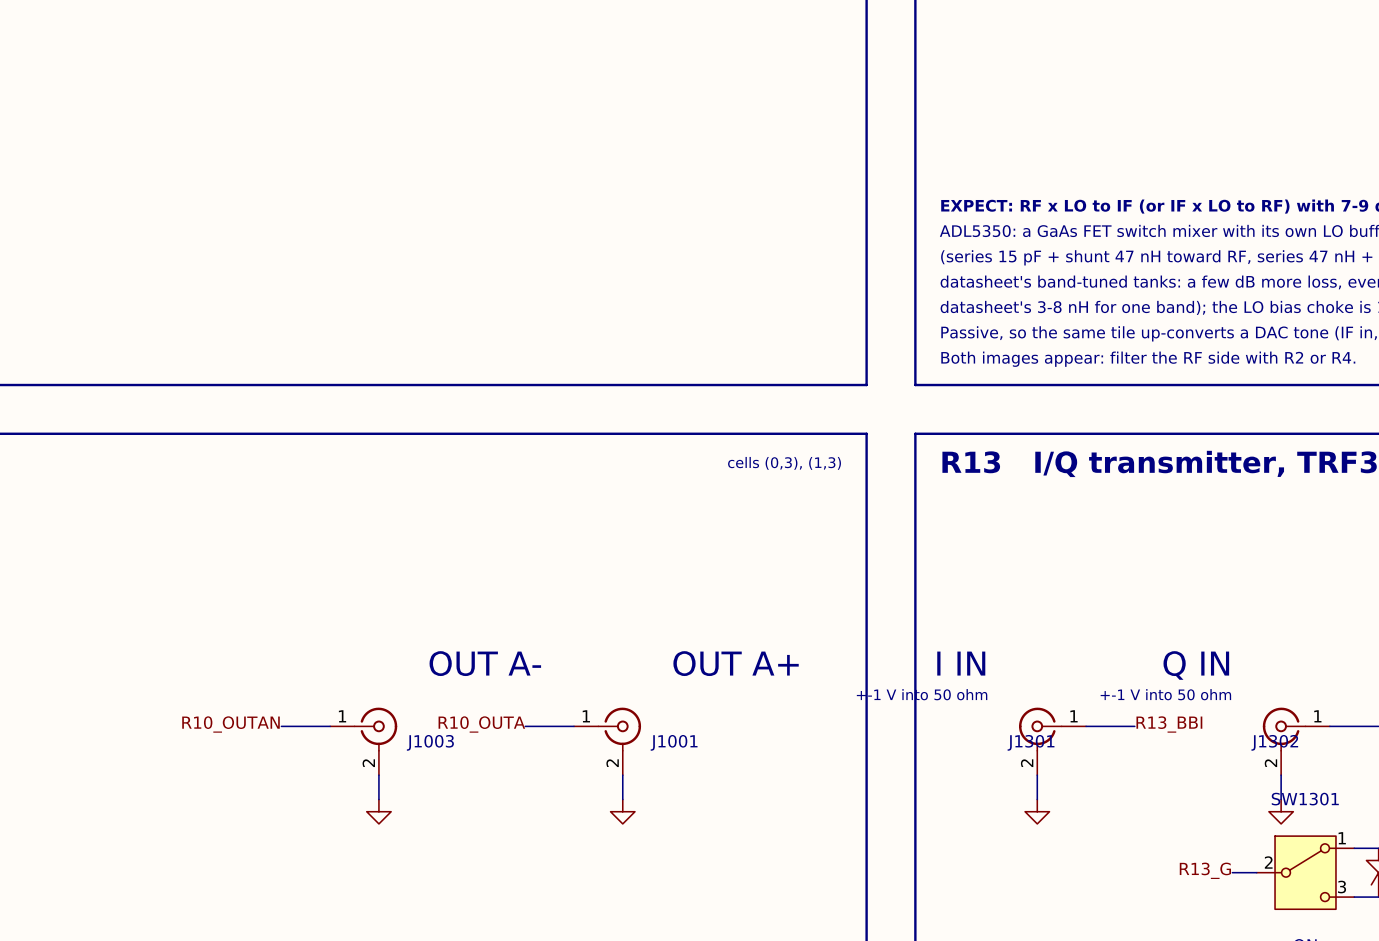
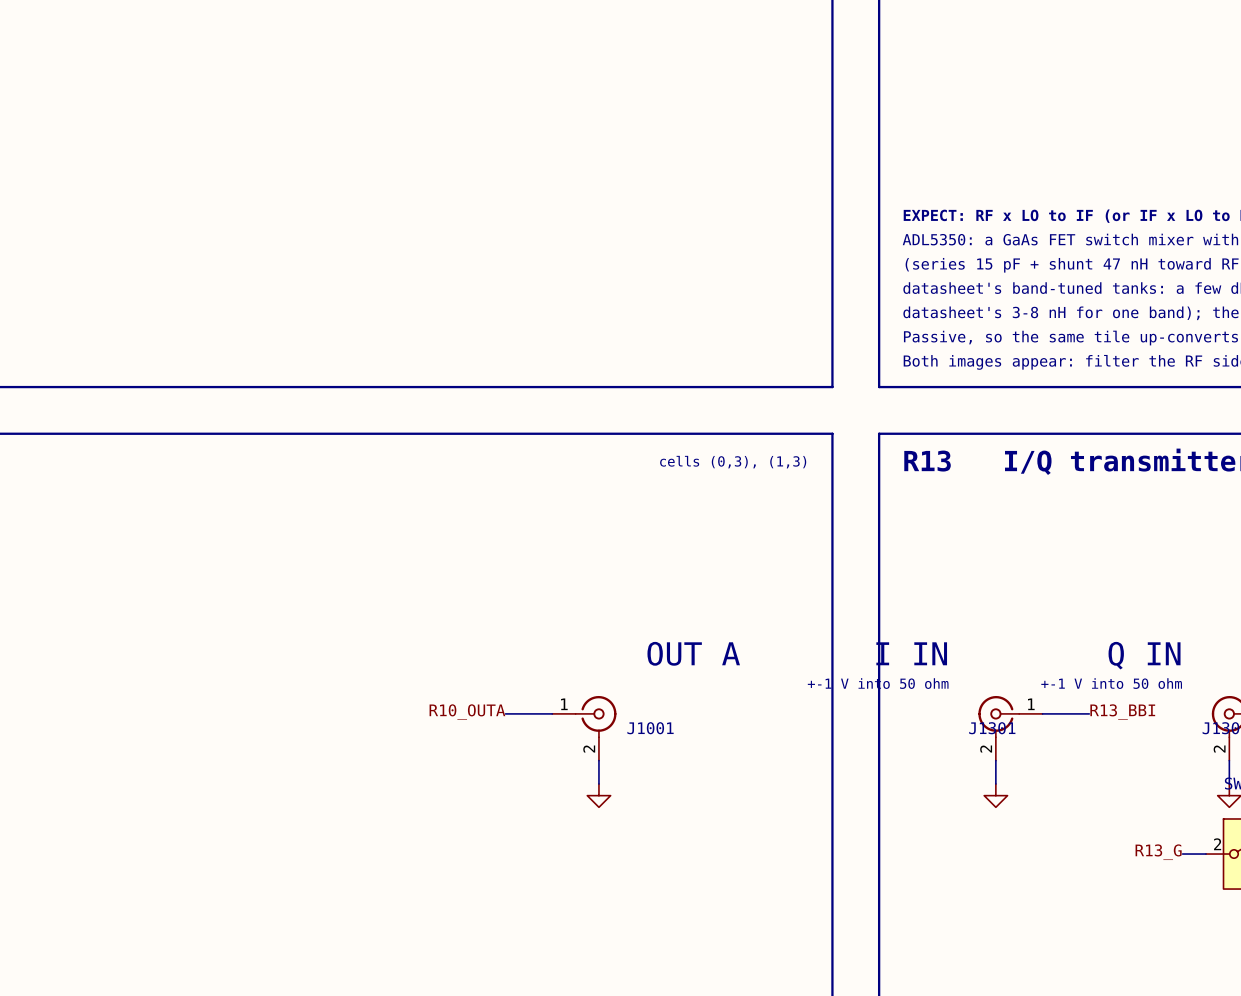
text: OUT A- (485, 663) -> none
text: OUT A+ (736, 663) -> OUT A (693, 653)
label: R10_OUTAN (231, 724) -> none
wire: (281, 726) (330, 726) -> none
J1003: (363, 741) -> none
wire: (378, 775) (378, 799) -> none
power symbol: (378, 811) -> none

